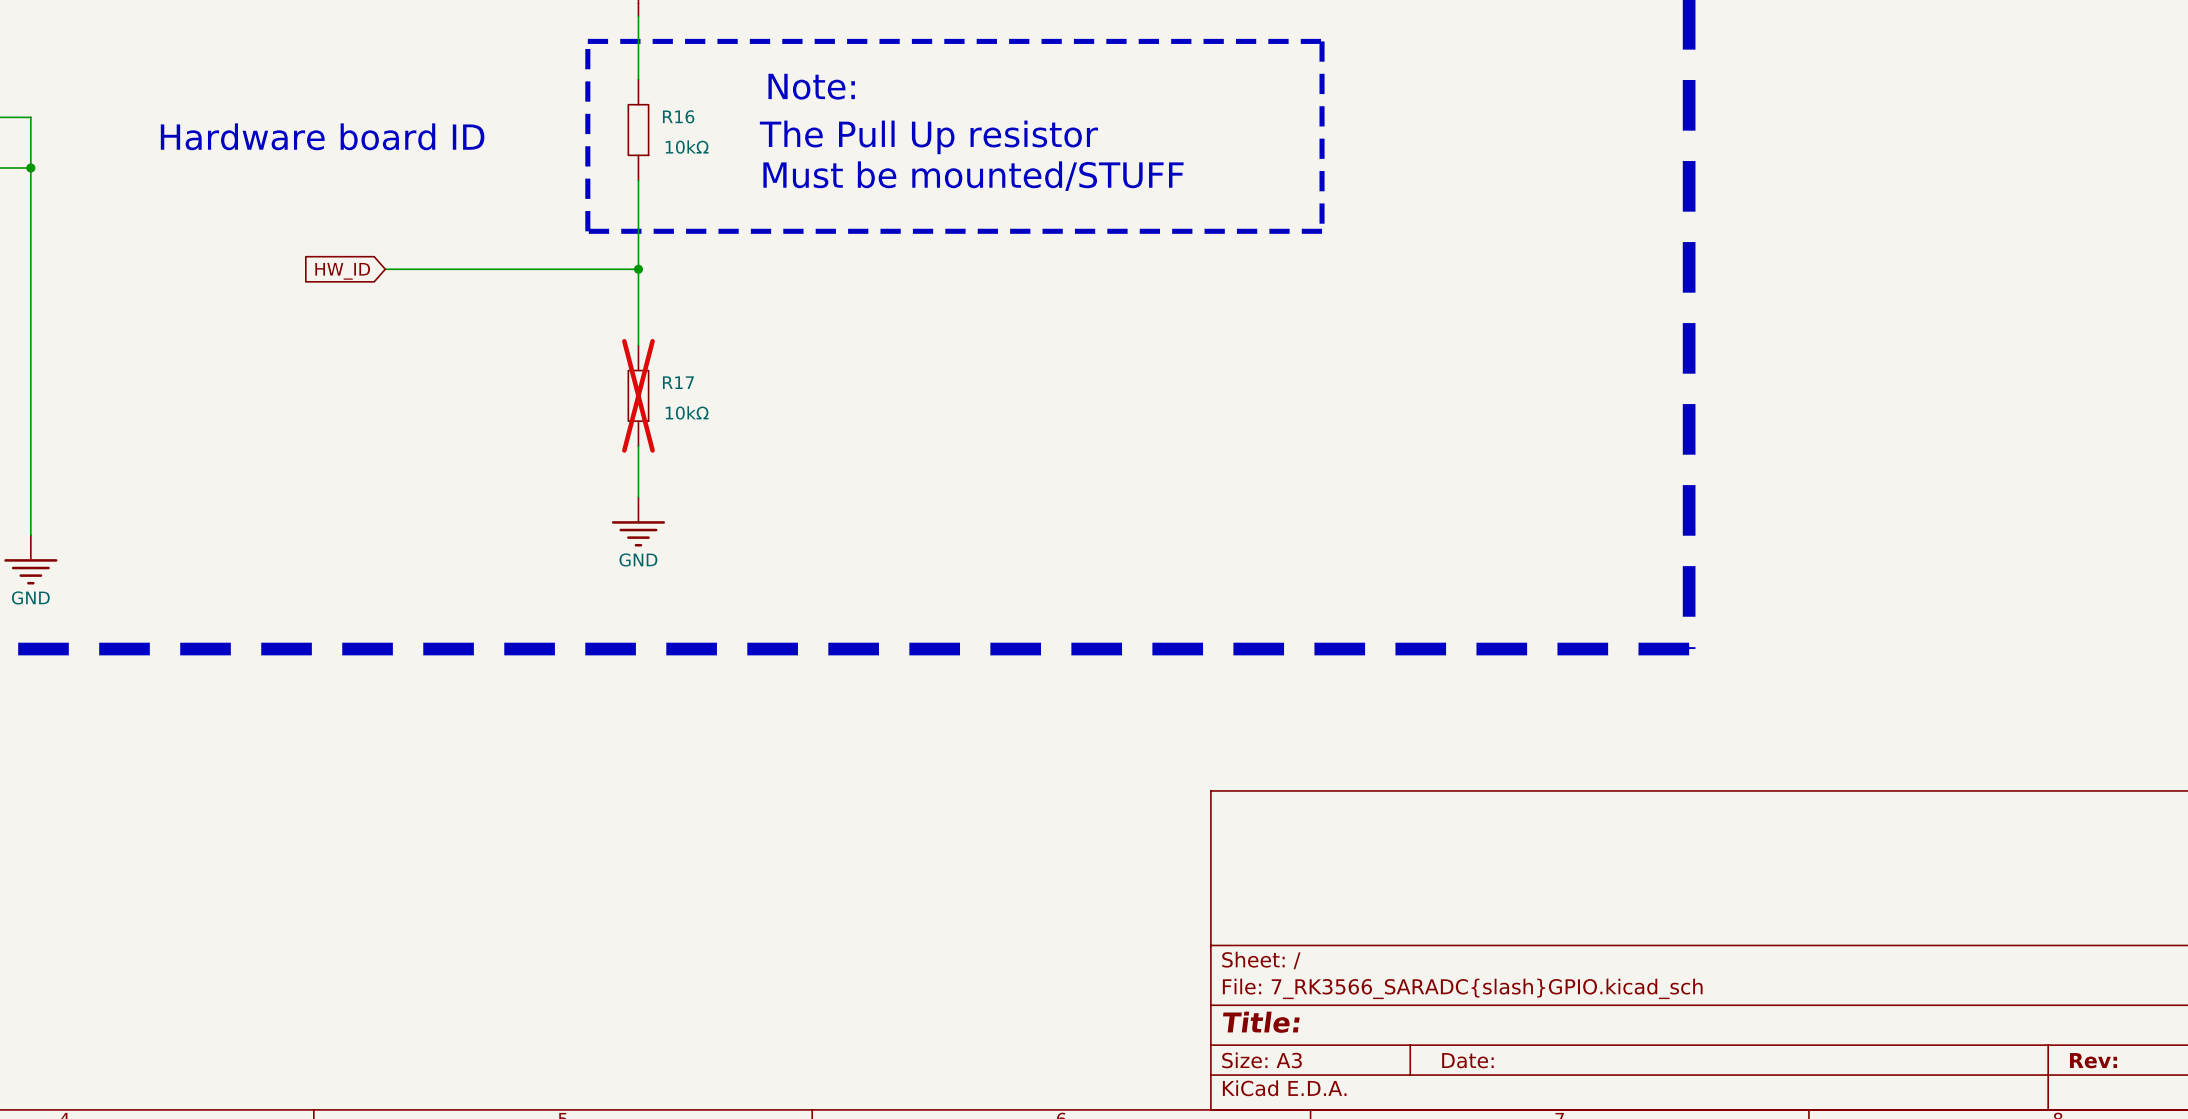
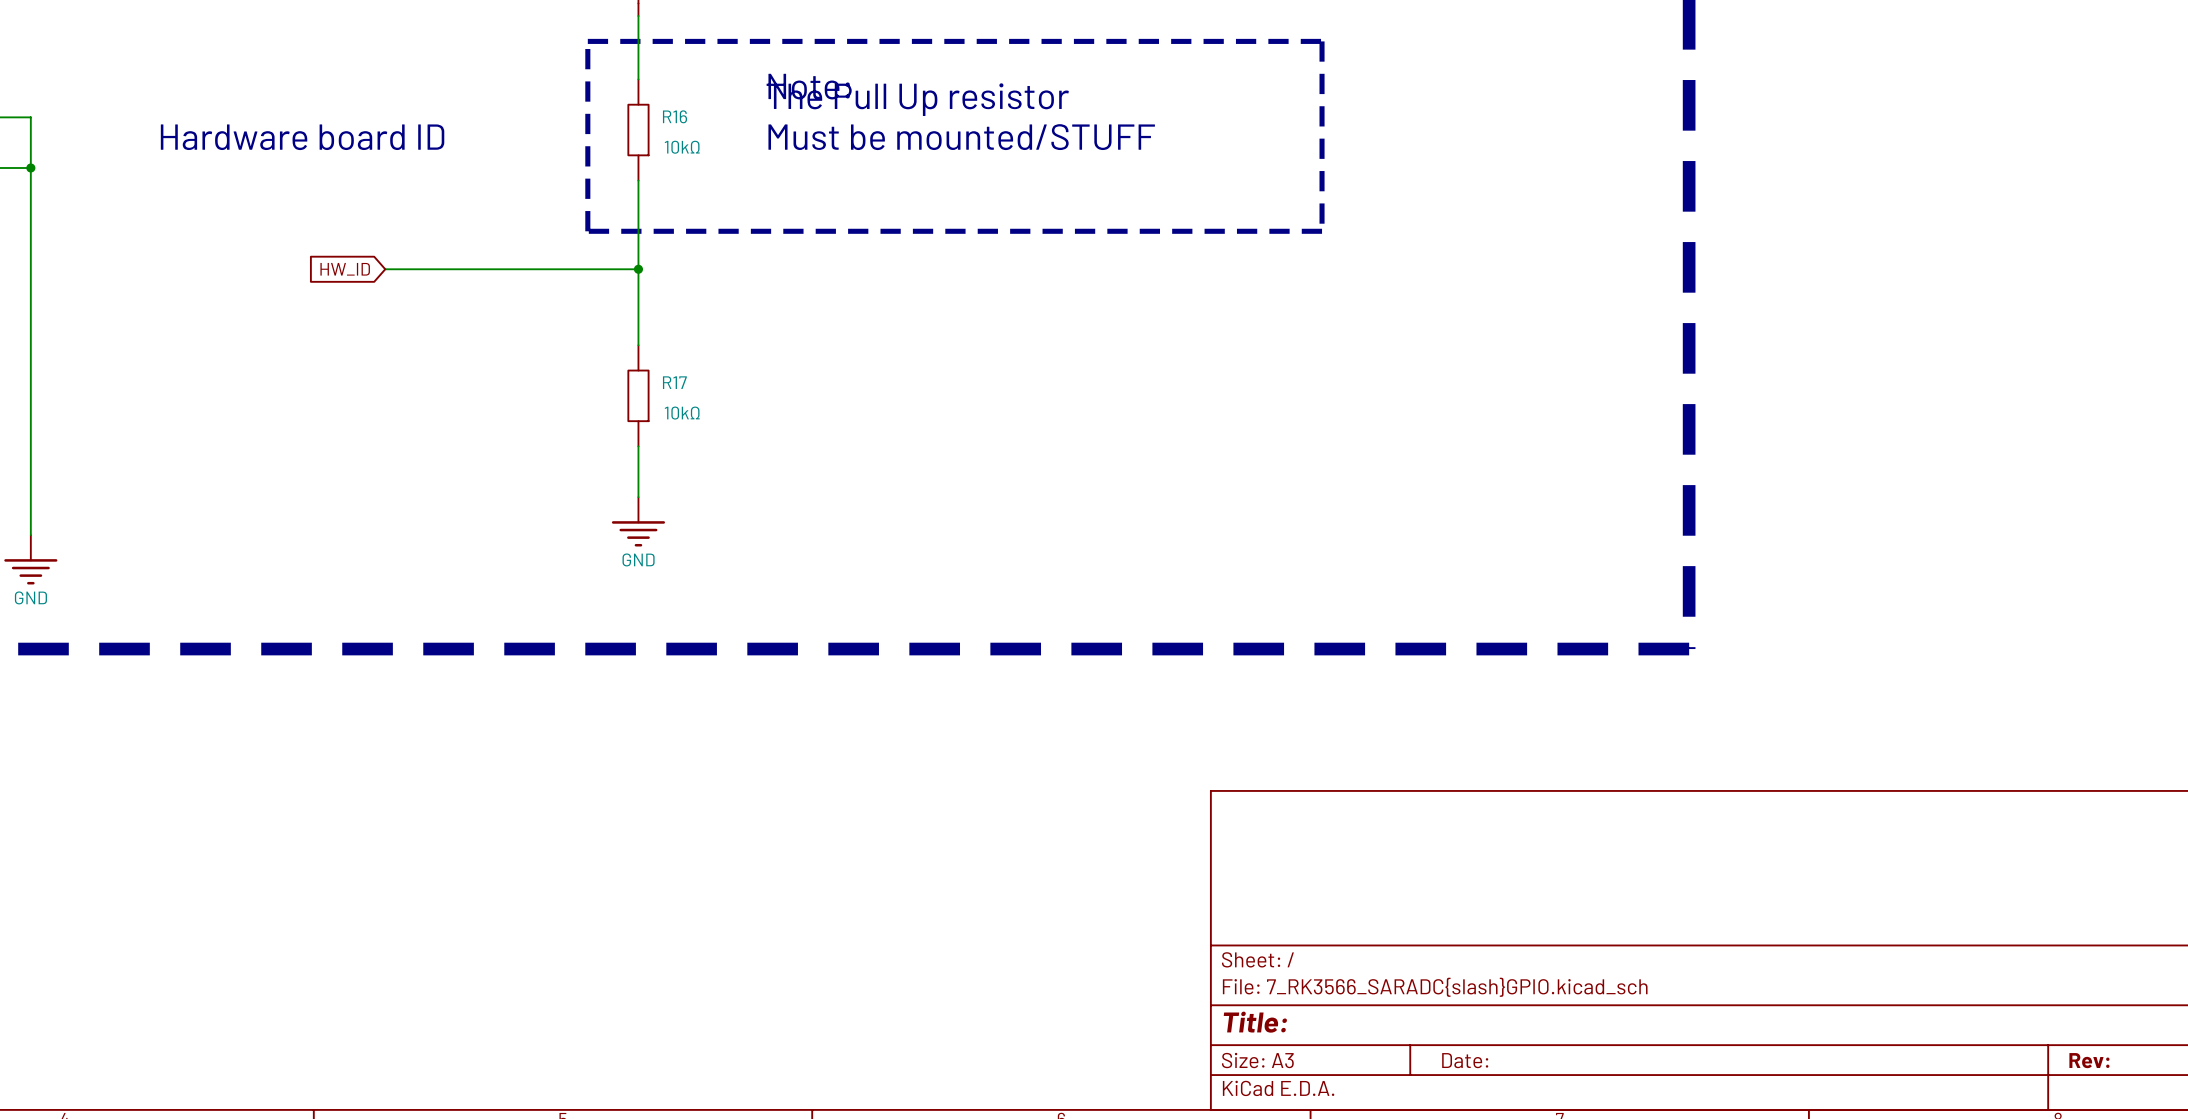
text: none -> The Pull Up resistor (917, 99)
text: The Pull Up resistor (928, 137) -> Must be mounted/STUFF (961, 137)
text: Must be mounted/STUFF (973, 176) -> none
R17 do-not-place cross: (638, 395) -> none

